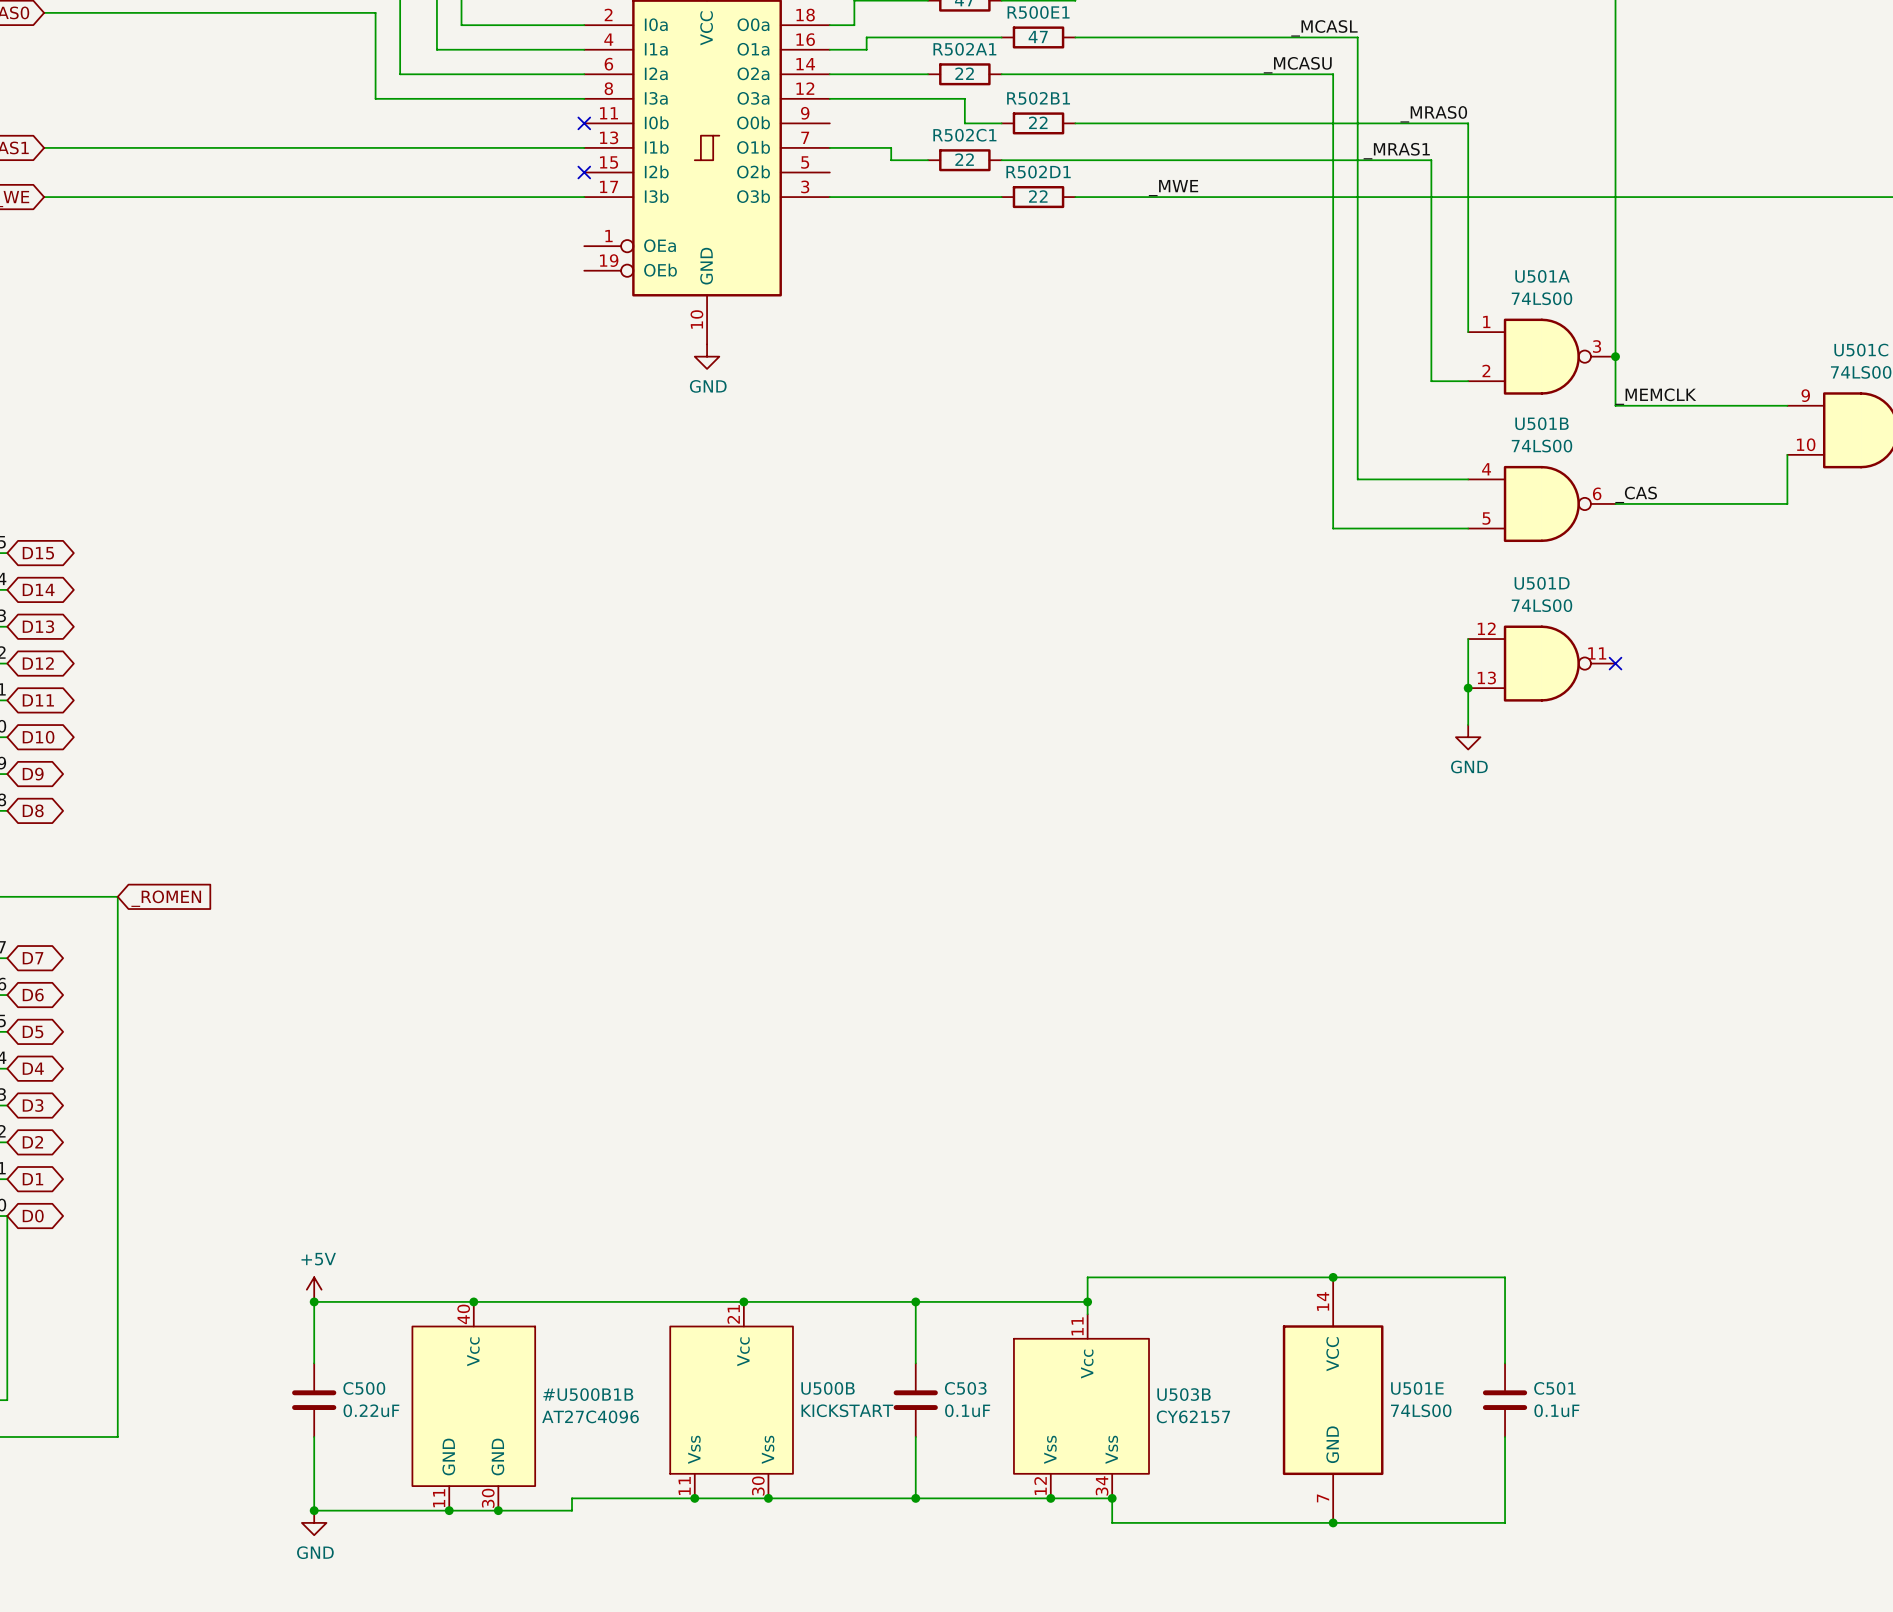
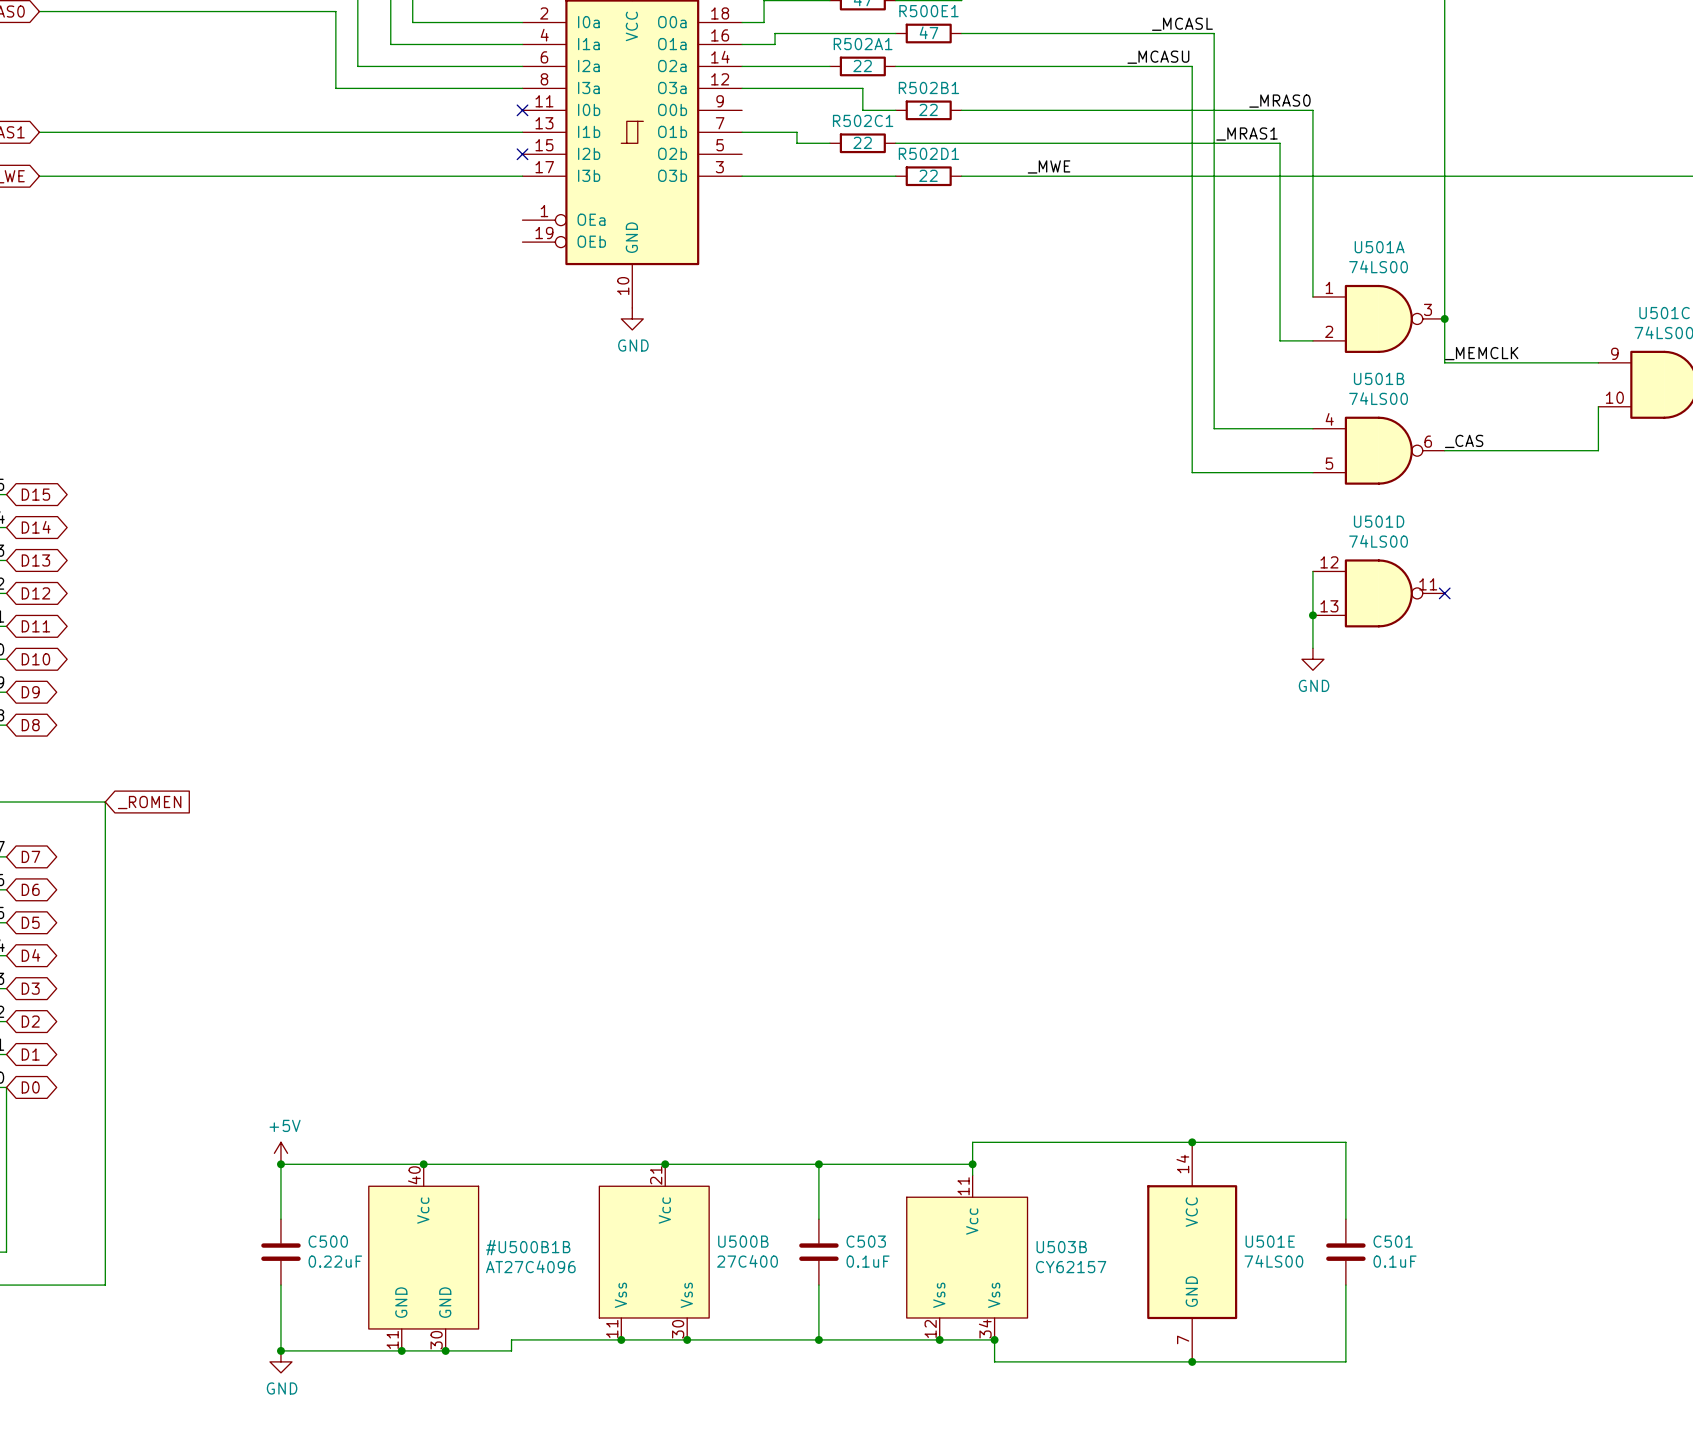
U500B value: KICKSTART (847, 1410) -> 27C400 (747, 1261)

